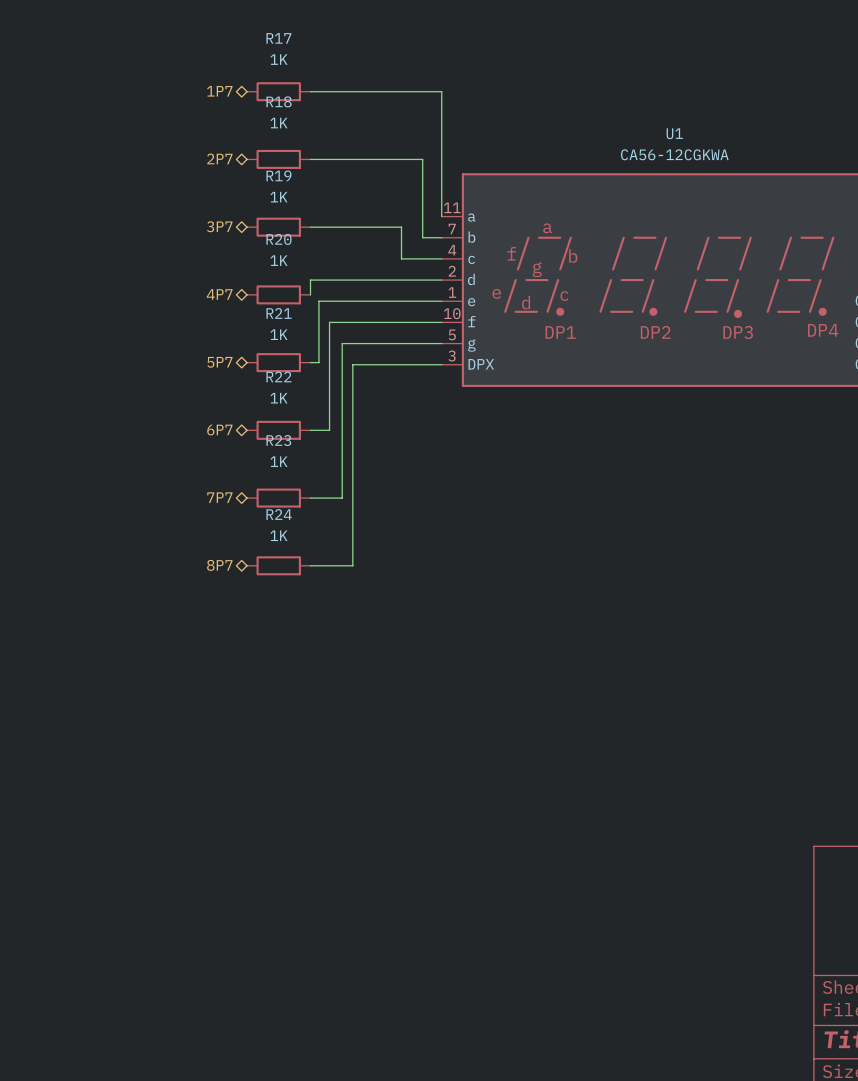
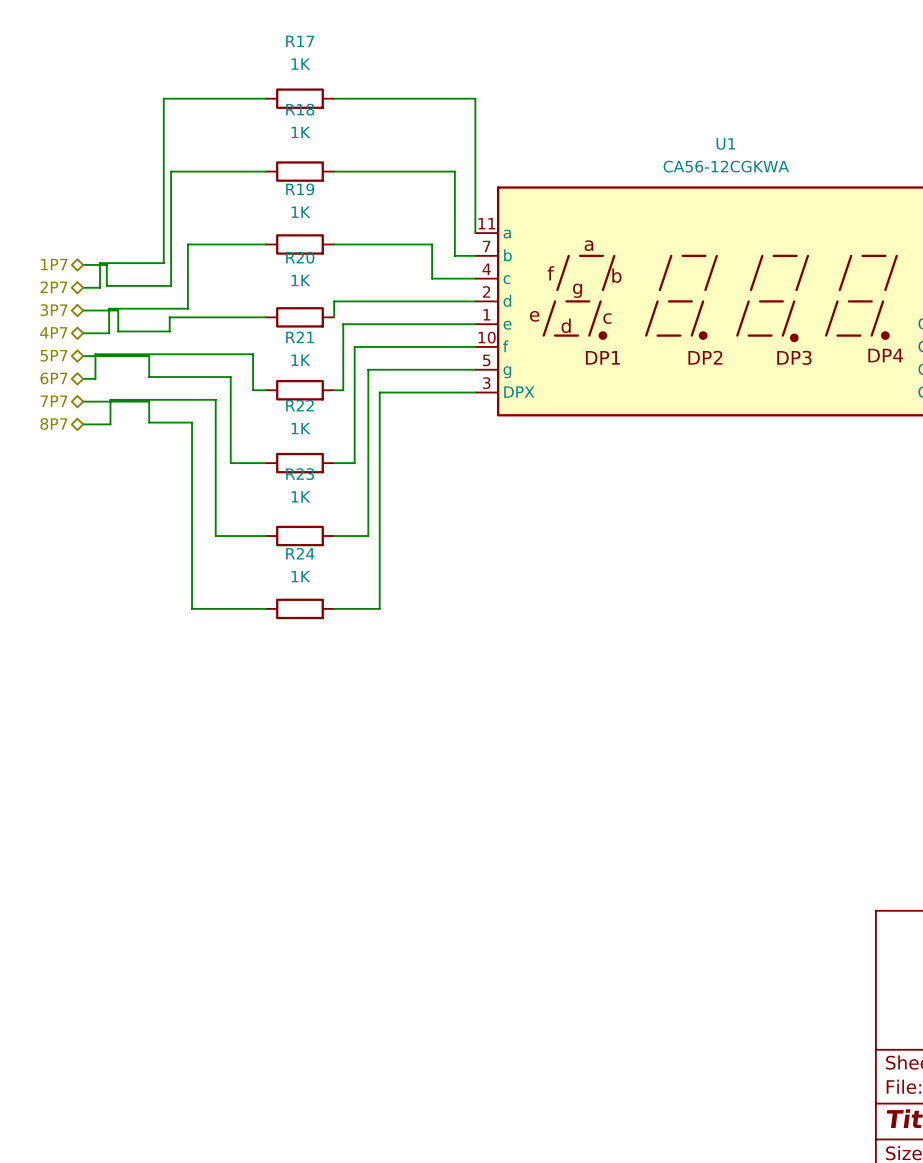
hierarchical label: 1P7 (219, 91) -> none
wire: none -> (265, 98) (163, 98) (163, 263) (100, 263) (100, 287) (83, 287)
hierarchical label position: 2P7 (219, 158) -> 2P7 (53, 287)
wire: none -> (265, 171) (171, 171) (171, 285) (106, 285) (106, 264) (83, 264)
hierarchical label position: 3P7 (219, 226) -> 3P7 (53, 310)
wire: none -> (265, 244) (187, 244) (187, 308) (109, 308) (109, 333) (83, 333)
hierarchical label: none -> 1P7 (54, 264)
wire: none -> (83, 310) (118, 310) (118, 331) (169, 331) (169, 317) (265, 317)
hierarchical label position: 4P7 (219, 294) -> 4P7 (53, 332)
wire: none -> (83, 356) (149, 356) (149, 377) (230, 377) (230, 463) (265, 463)
wire: none -> (83, 378) (95, 378) (95, 354) (253, 354) (253, 390) (265, 390)
hierarchical label position: 5P7 (219, 362) -> 5P7 (53, 355)
hierarchical label: none -> 7P7 (54, 401)
wire: none -> (83, 401) (149, 401) (149, 422) (192, 422) (192, 608) (265, 608)
hierarchical label: none -> 8P7 (53, 423)
wire: none -> (83, 424) (110, 424) (110, 399) (215, 399) (215, 536) (265, 536)
hierarchical label position: 6P7 (219, 430) -> 6P7 (53, 378)
hierarchical label: 7P7 (219, 497) -> none
hierarchical label: 8P7 (219, 565) -> none

